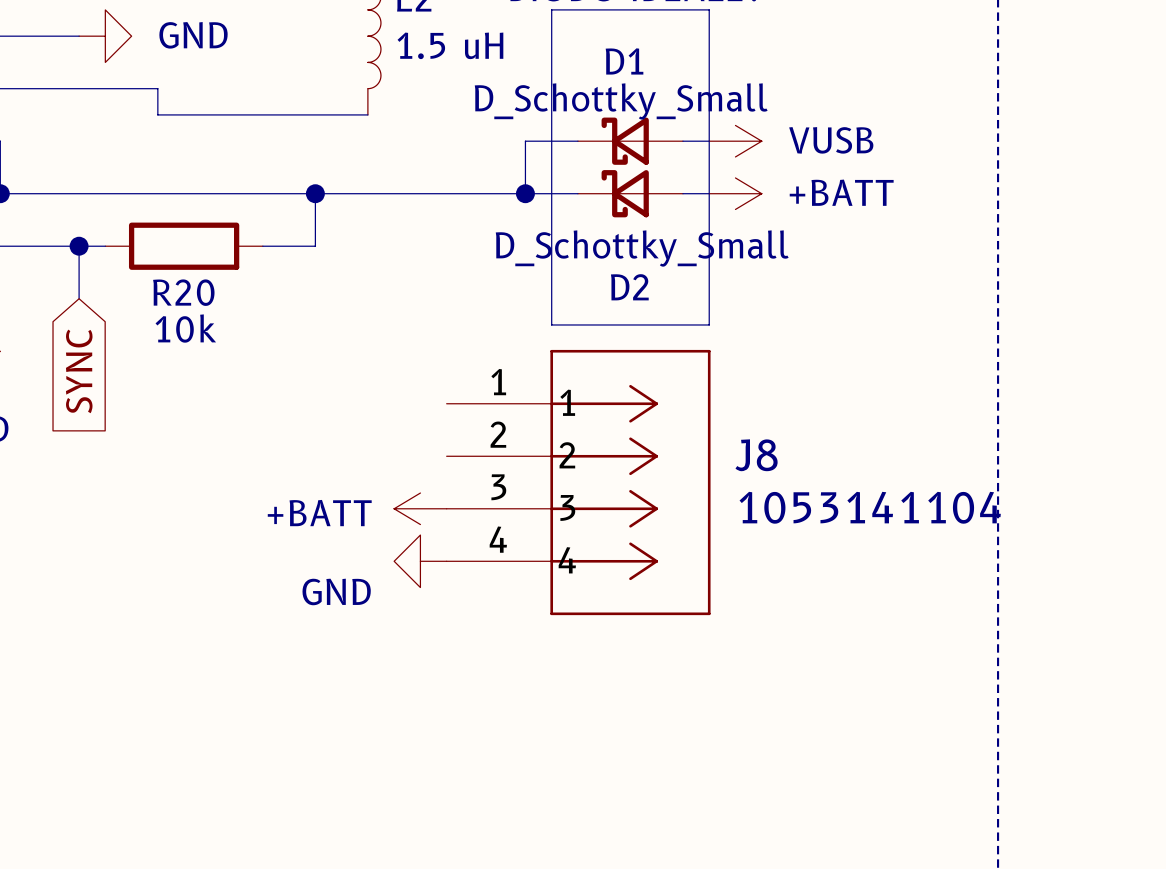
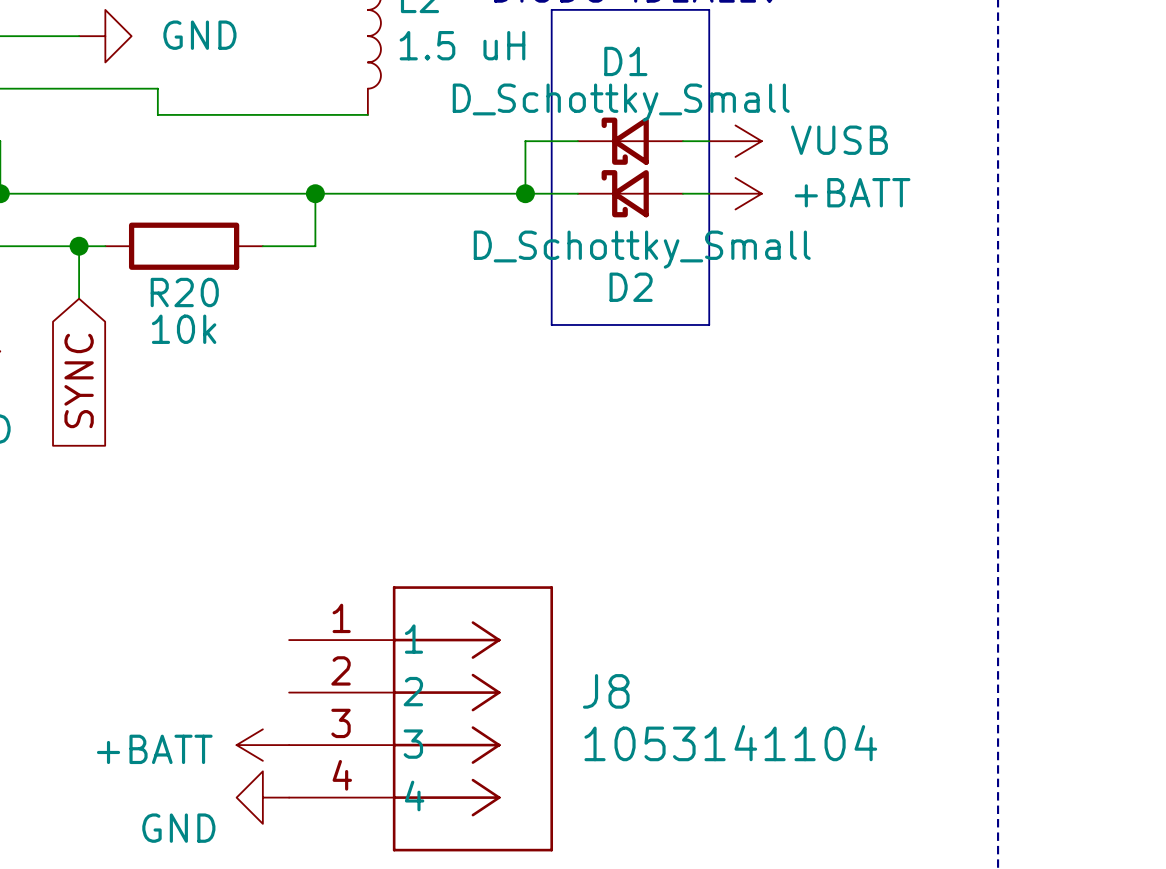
J8 position: (578, 482) -> (421, 718)
power symbol position: +BATT (420, 508) -> +BATT (262, 745)
power symbol position: GND (420, 561) -> GND (262, 797)

